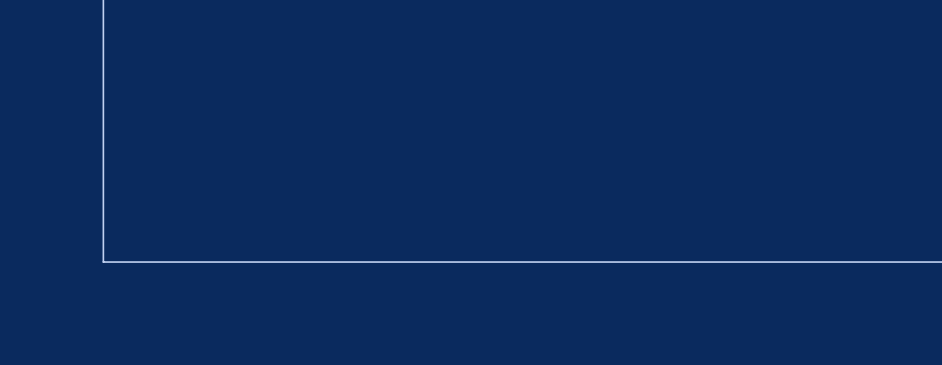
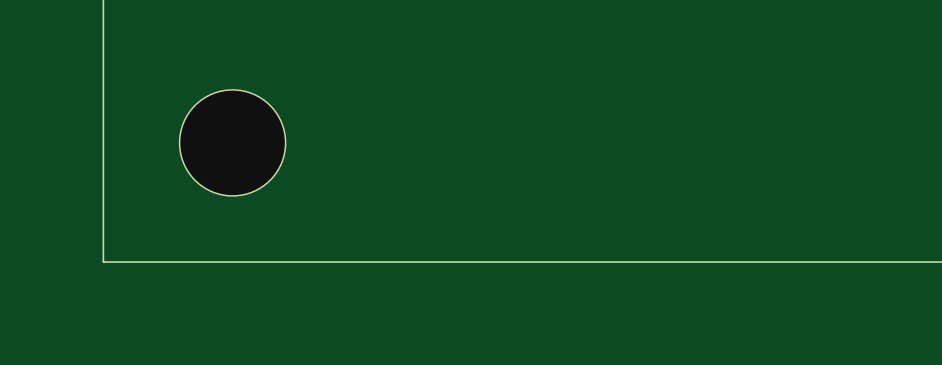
part: none -> (232, 142)

